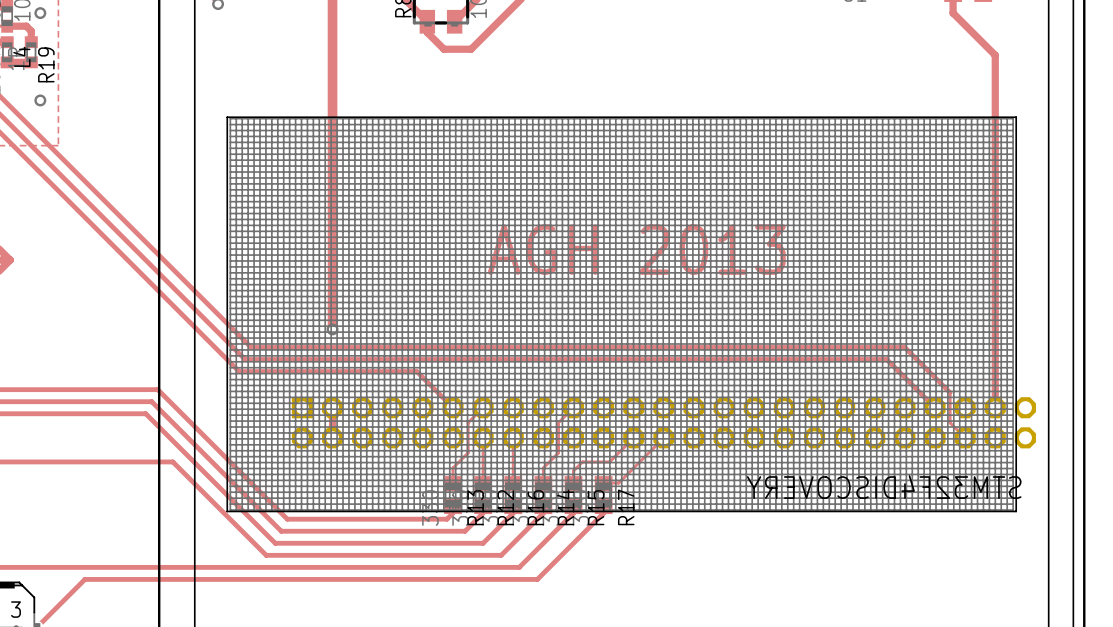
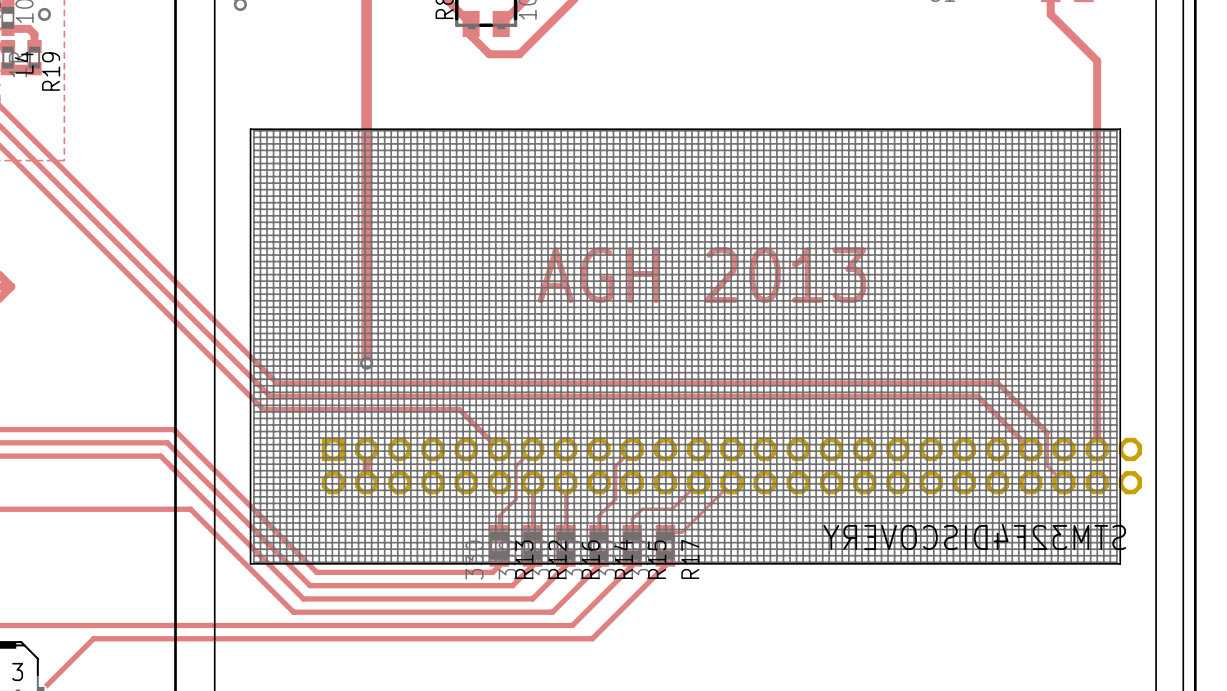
via: (40, 100) -> none

